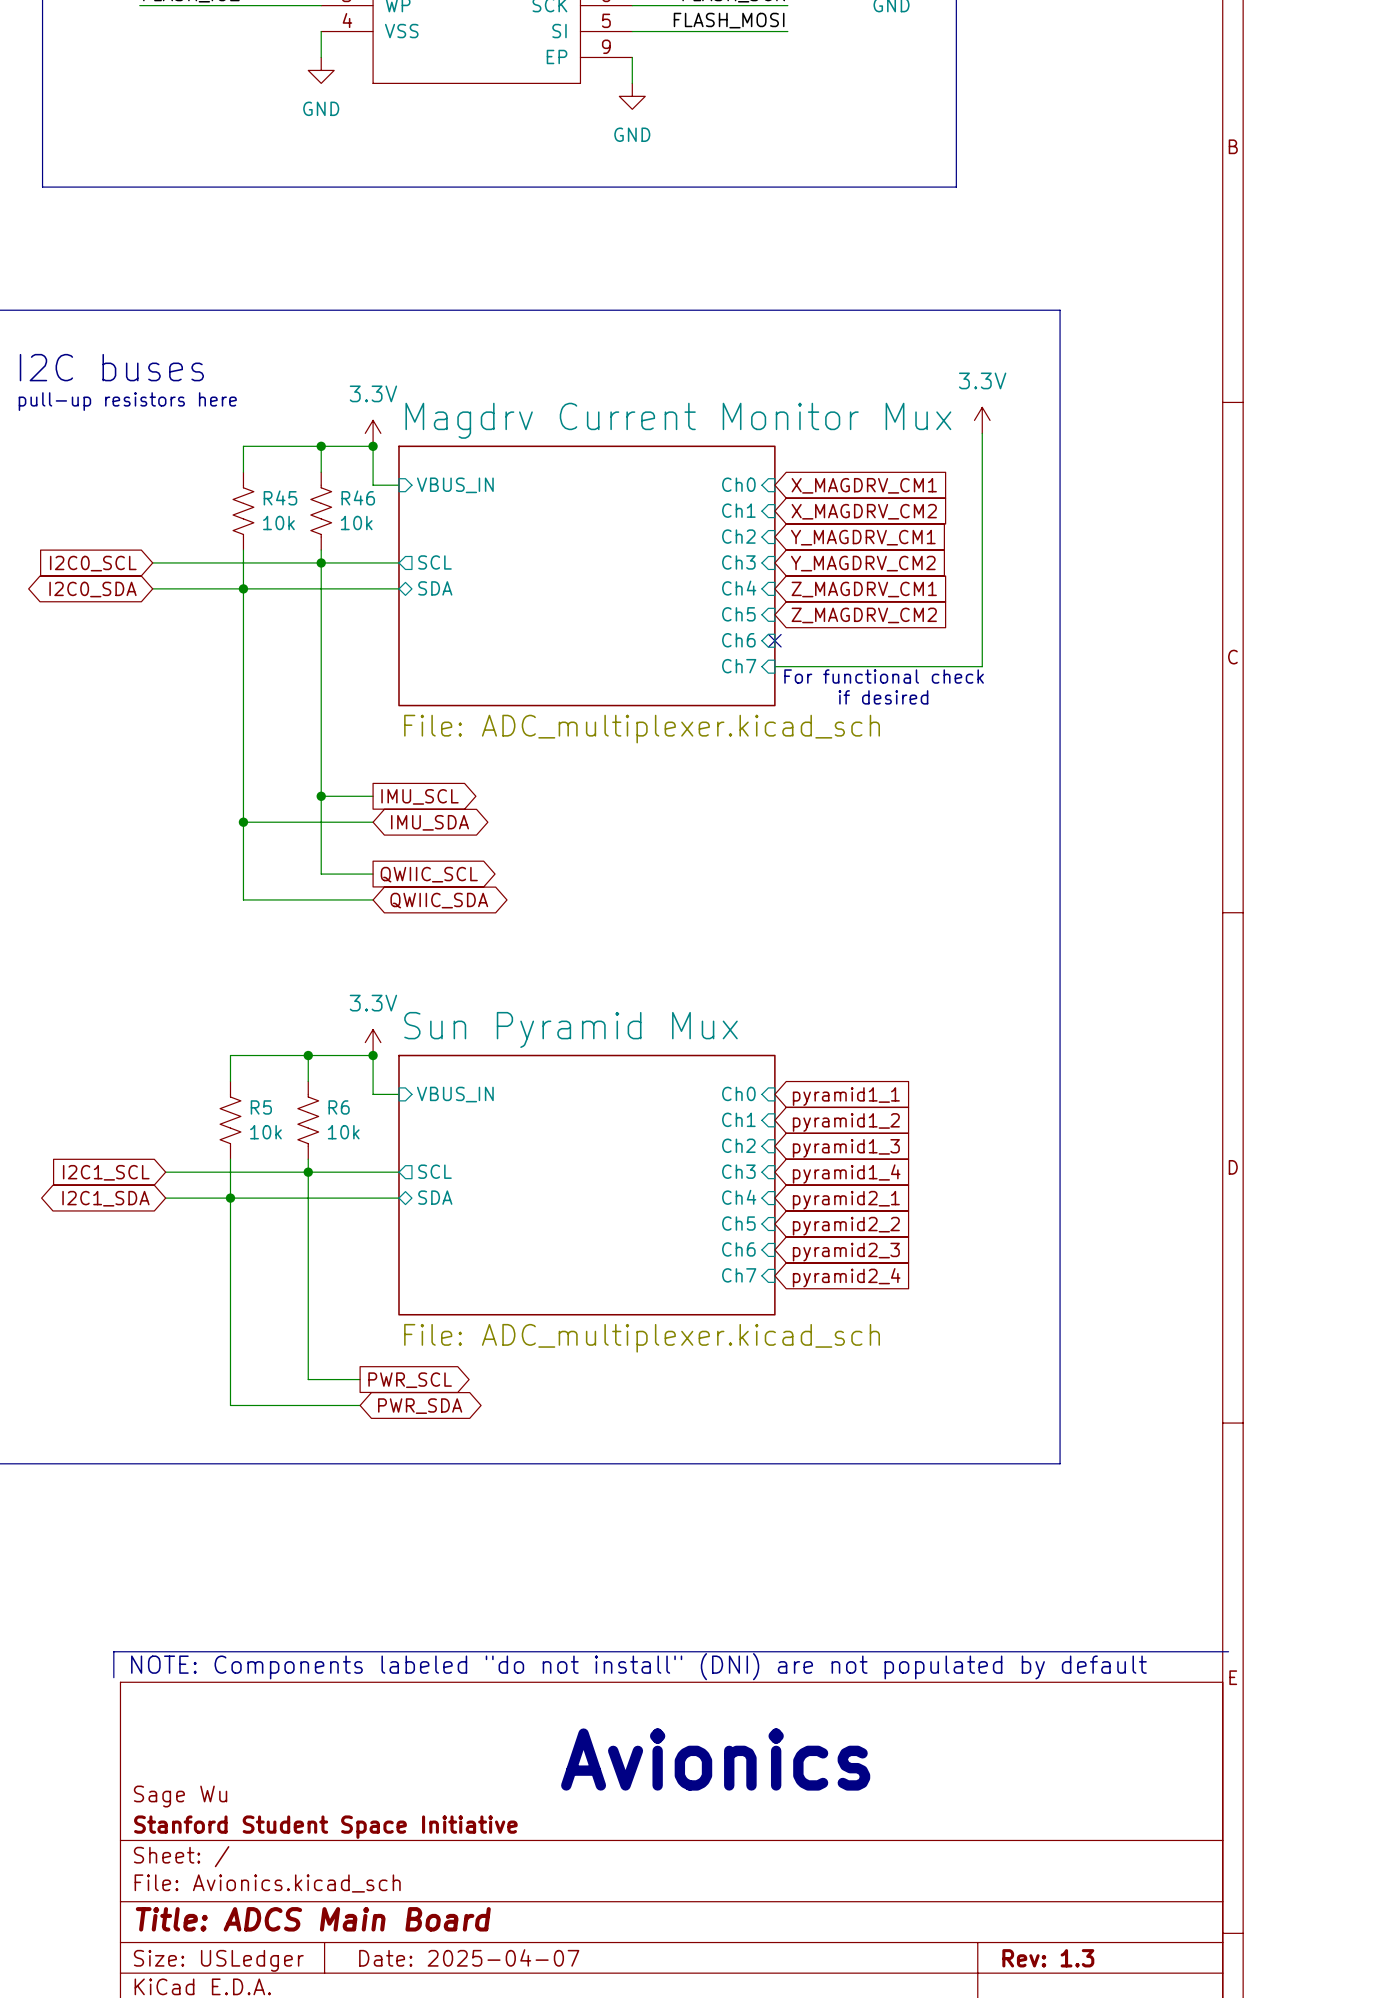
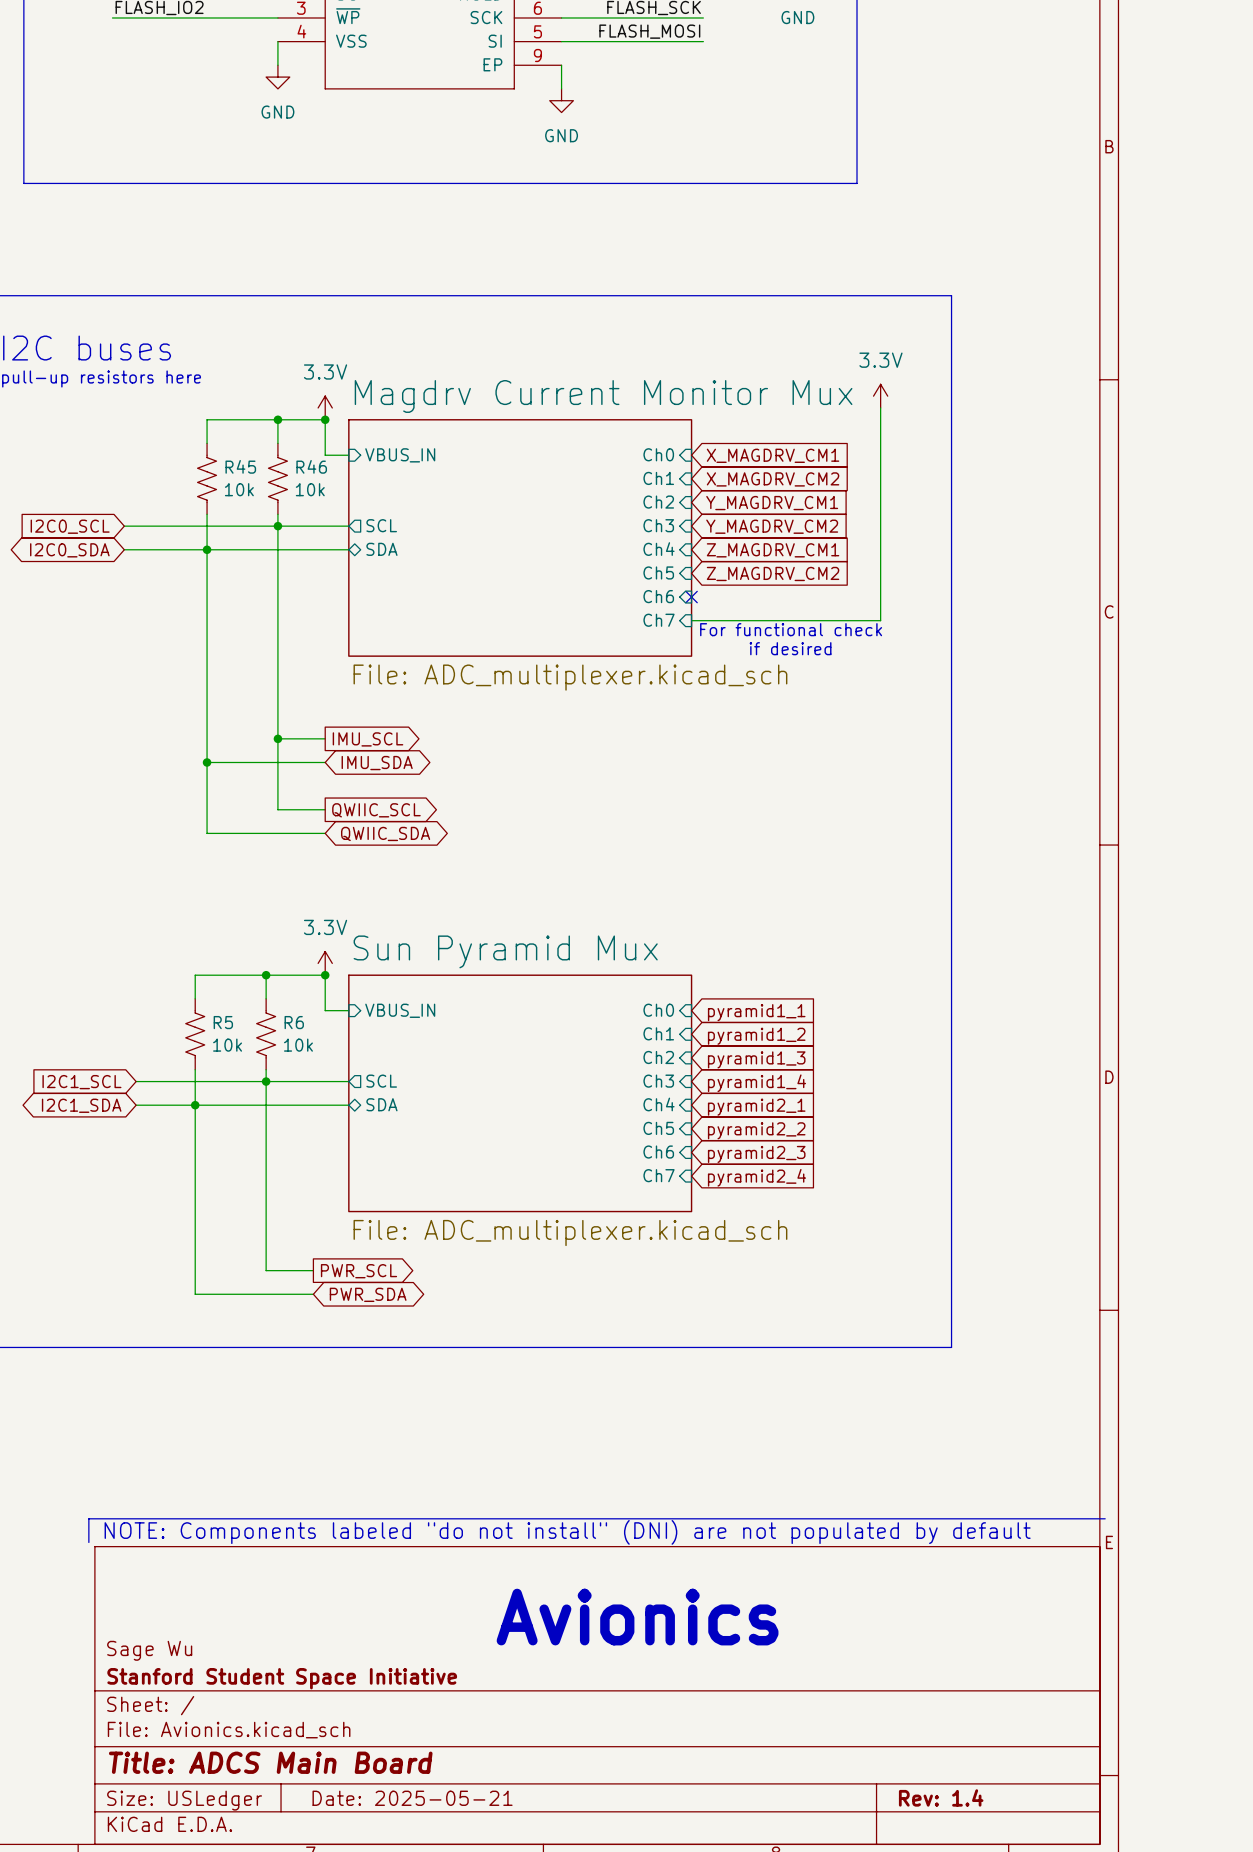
title block: Date: 2025-04-07 (469, 1957) -> Date: 2025-05-21 (412, 1798)
title block: Rev: 1.3 (1048, 1958) -> Rev: 1.4 (941, 1797)

